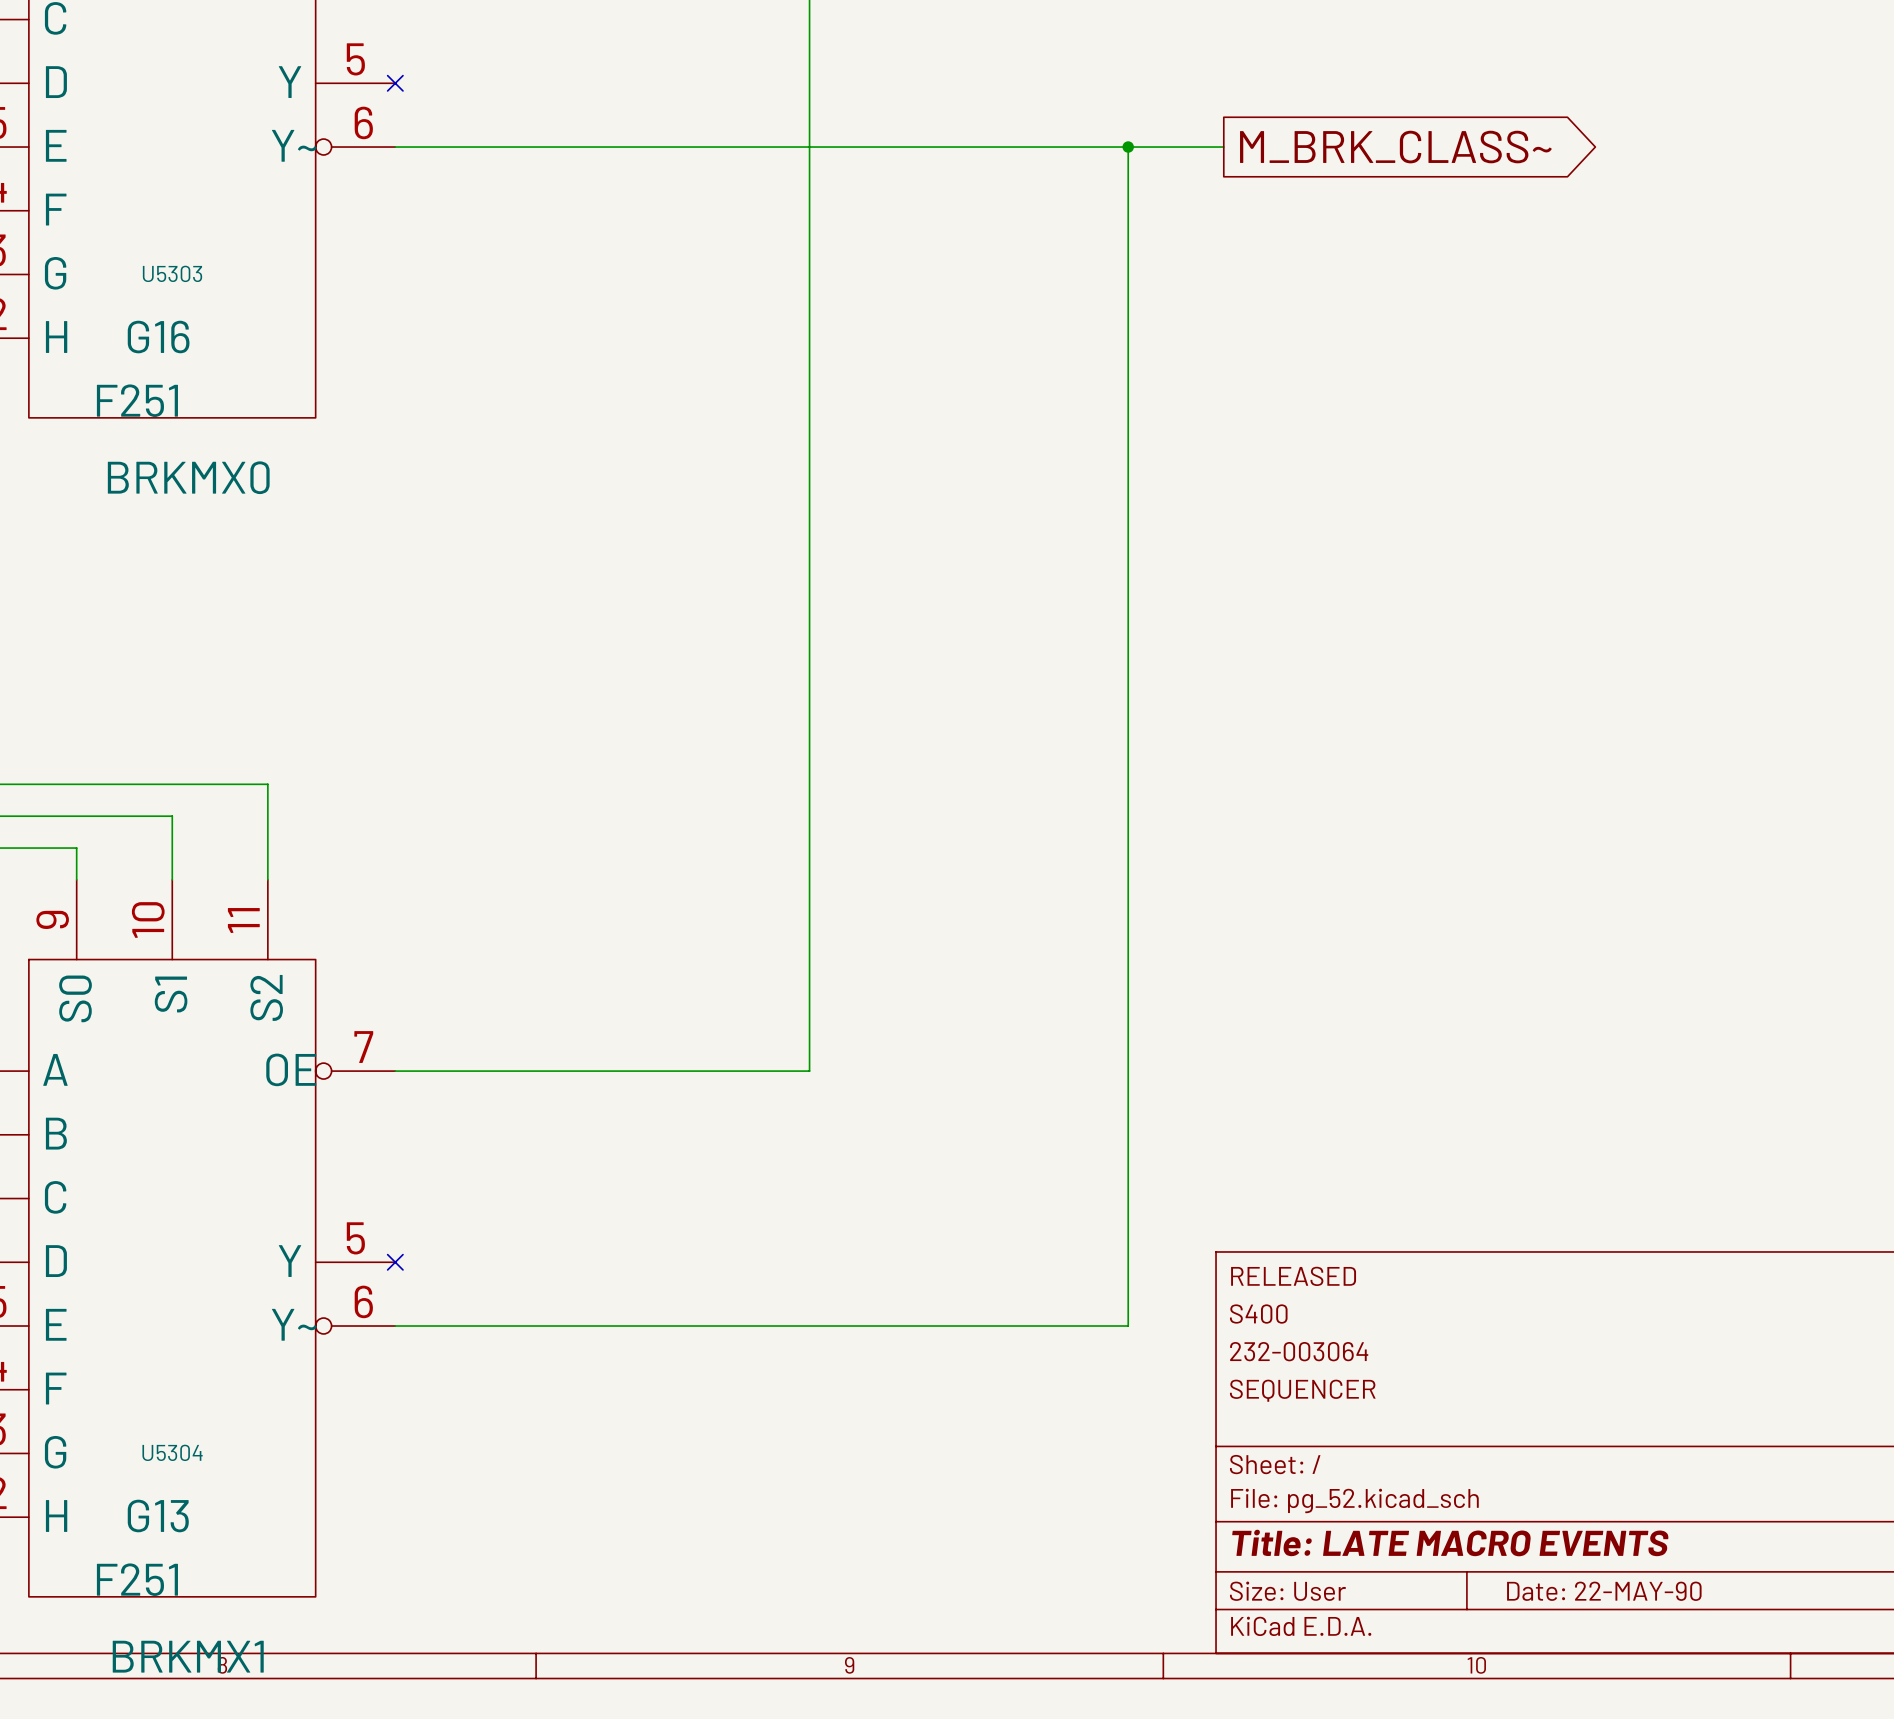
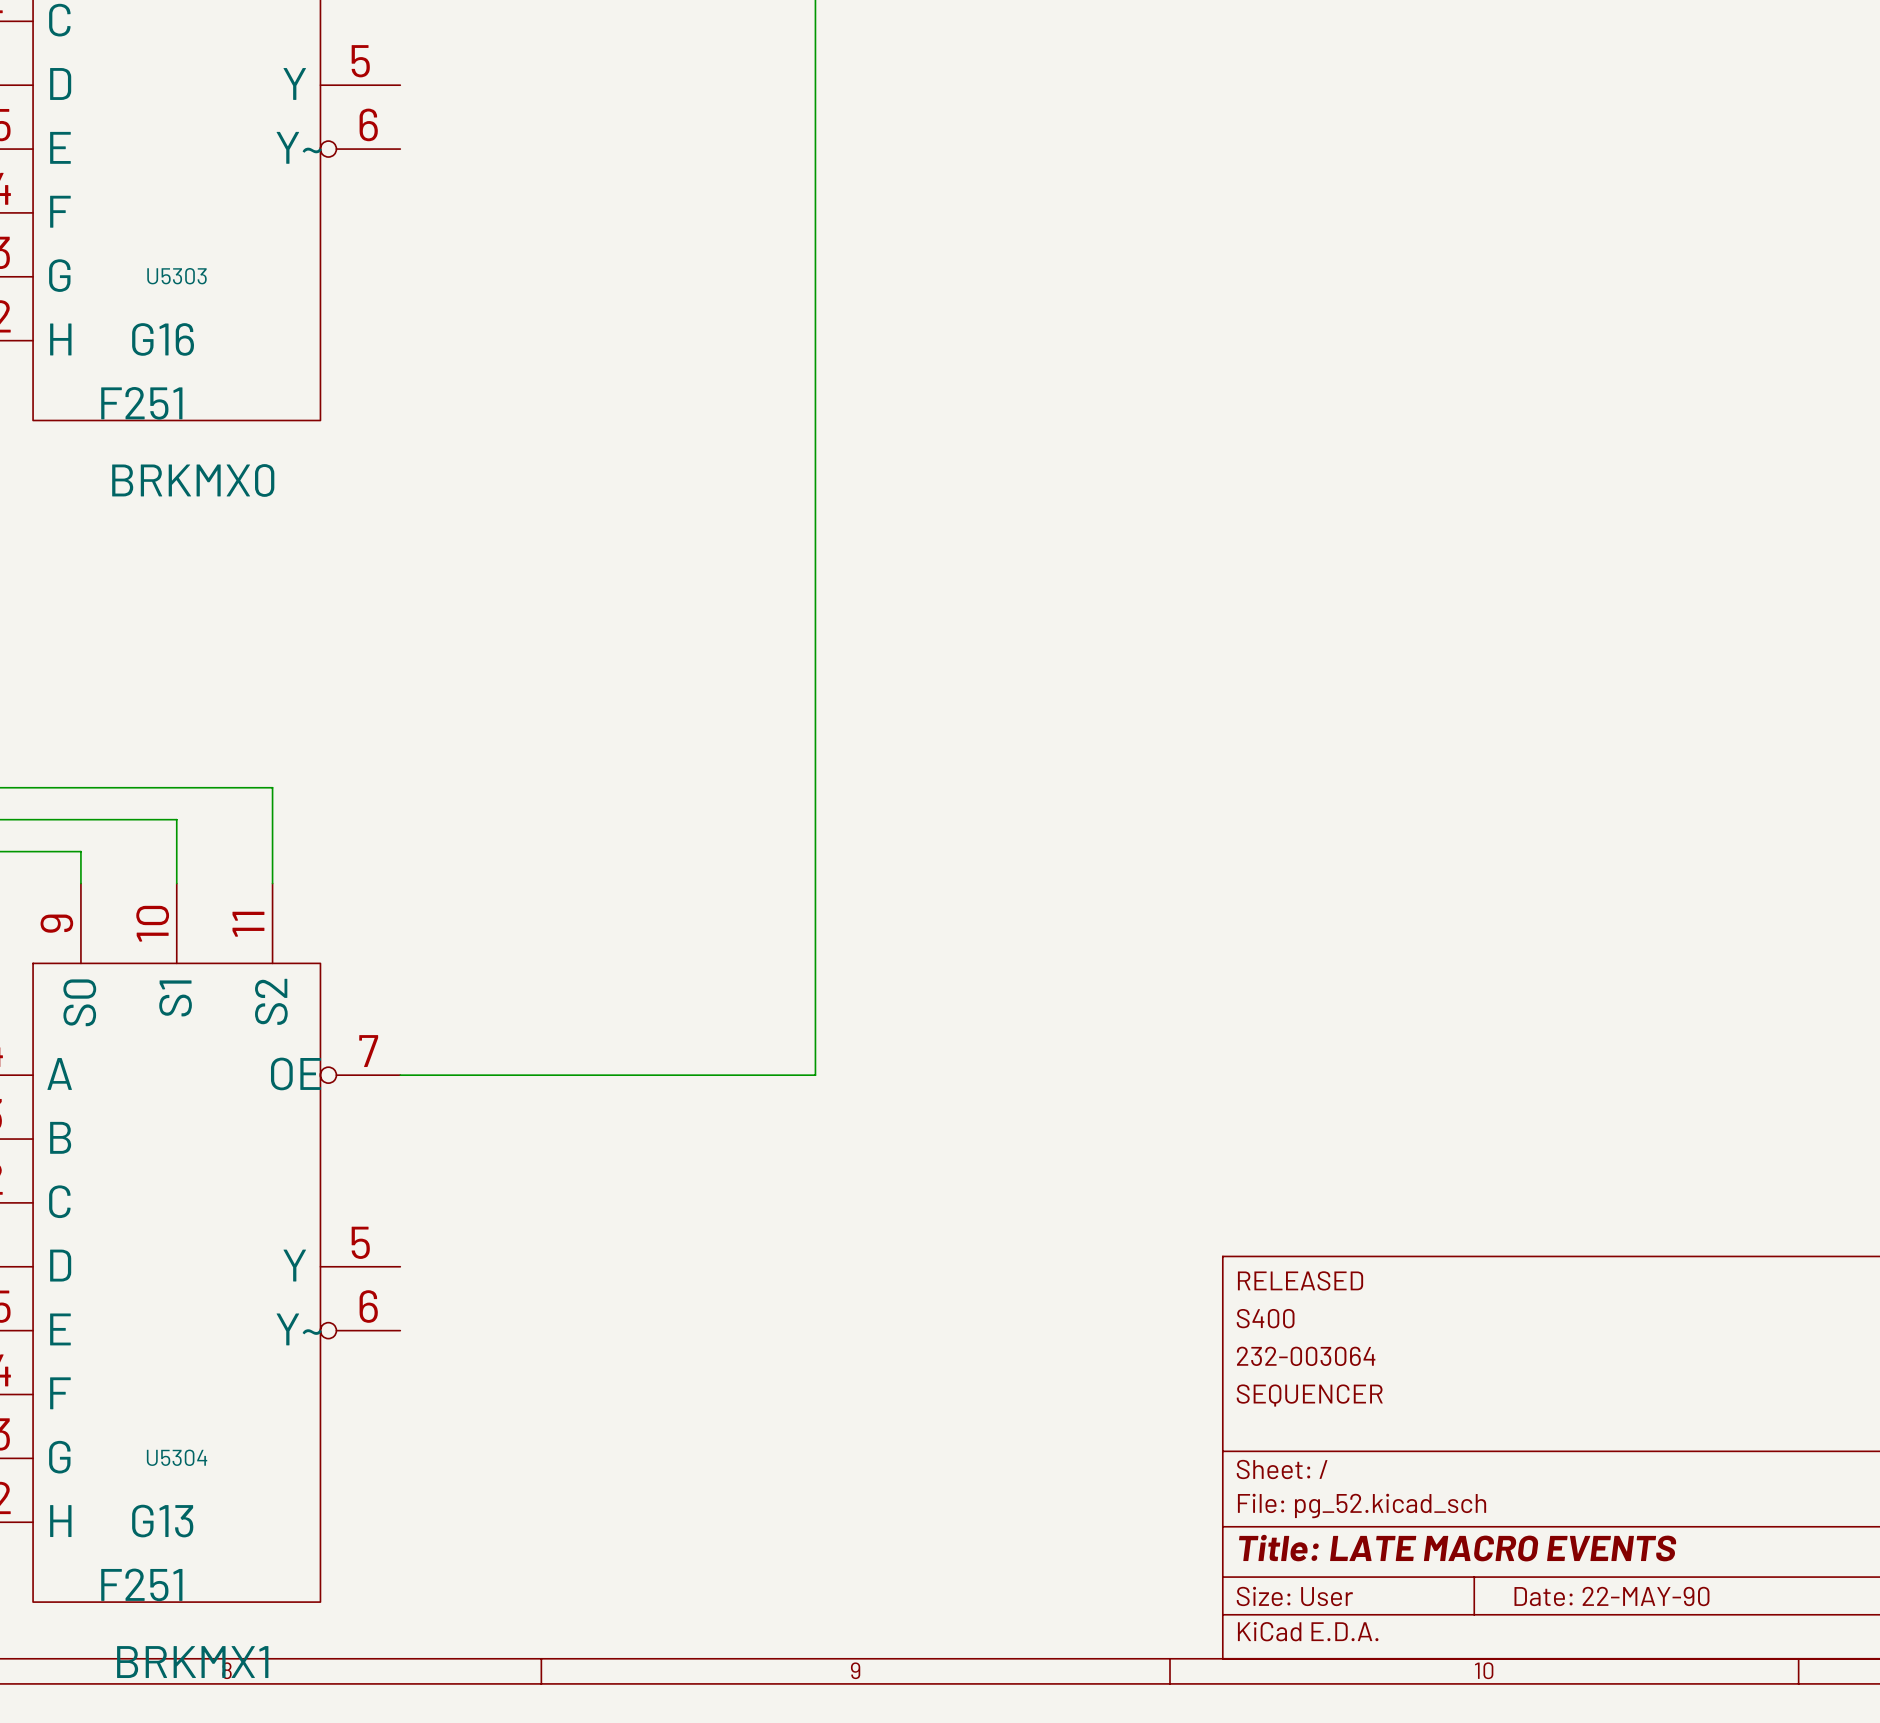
no-connect mark: (395, 83) -> none
wire: (395, 147) (1223, 147) -> none
wire: (1128, 147) (1128, 1326) (395, 1326) -> none
junction: (1128, 147) -> none
global label: M_BRK_CLASS~ (1395, 147) -> none
no-connect mark: (395, 1262) -> none

